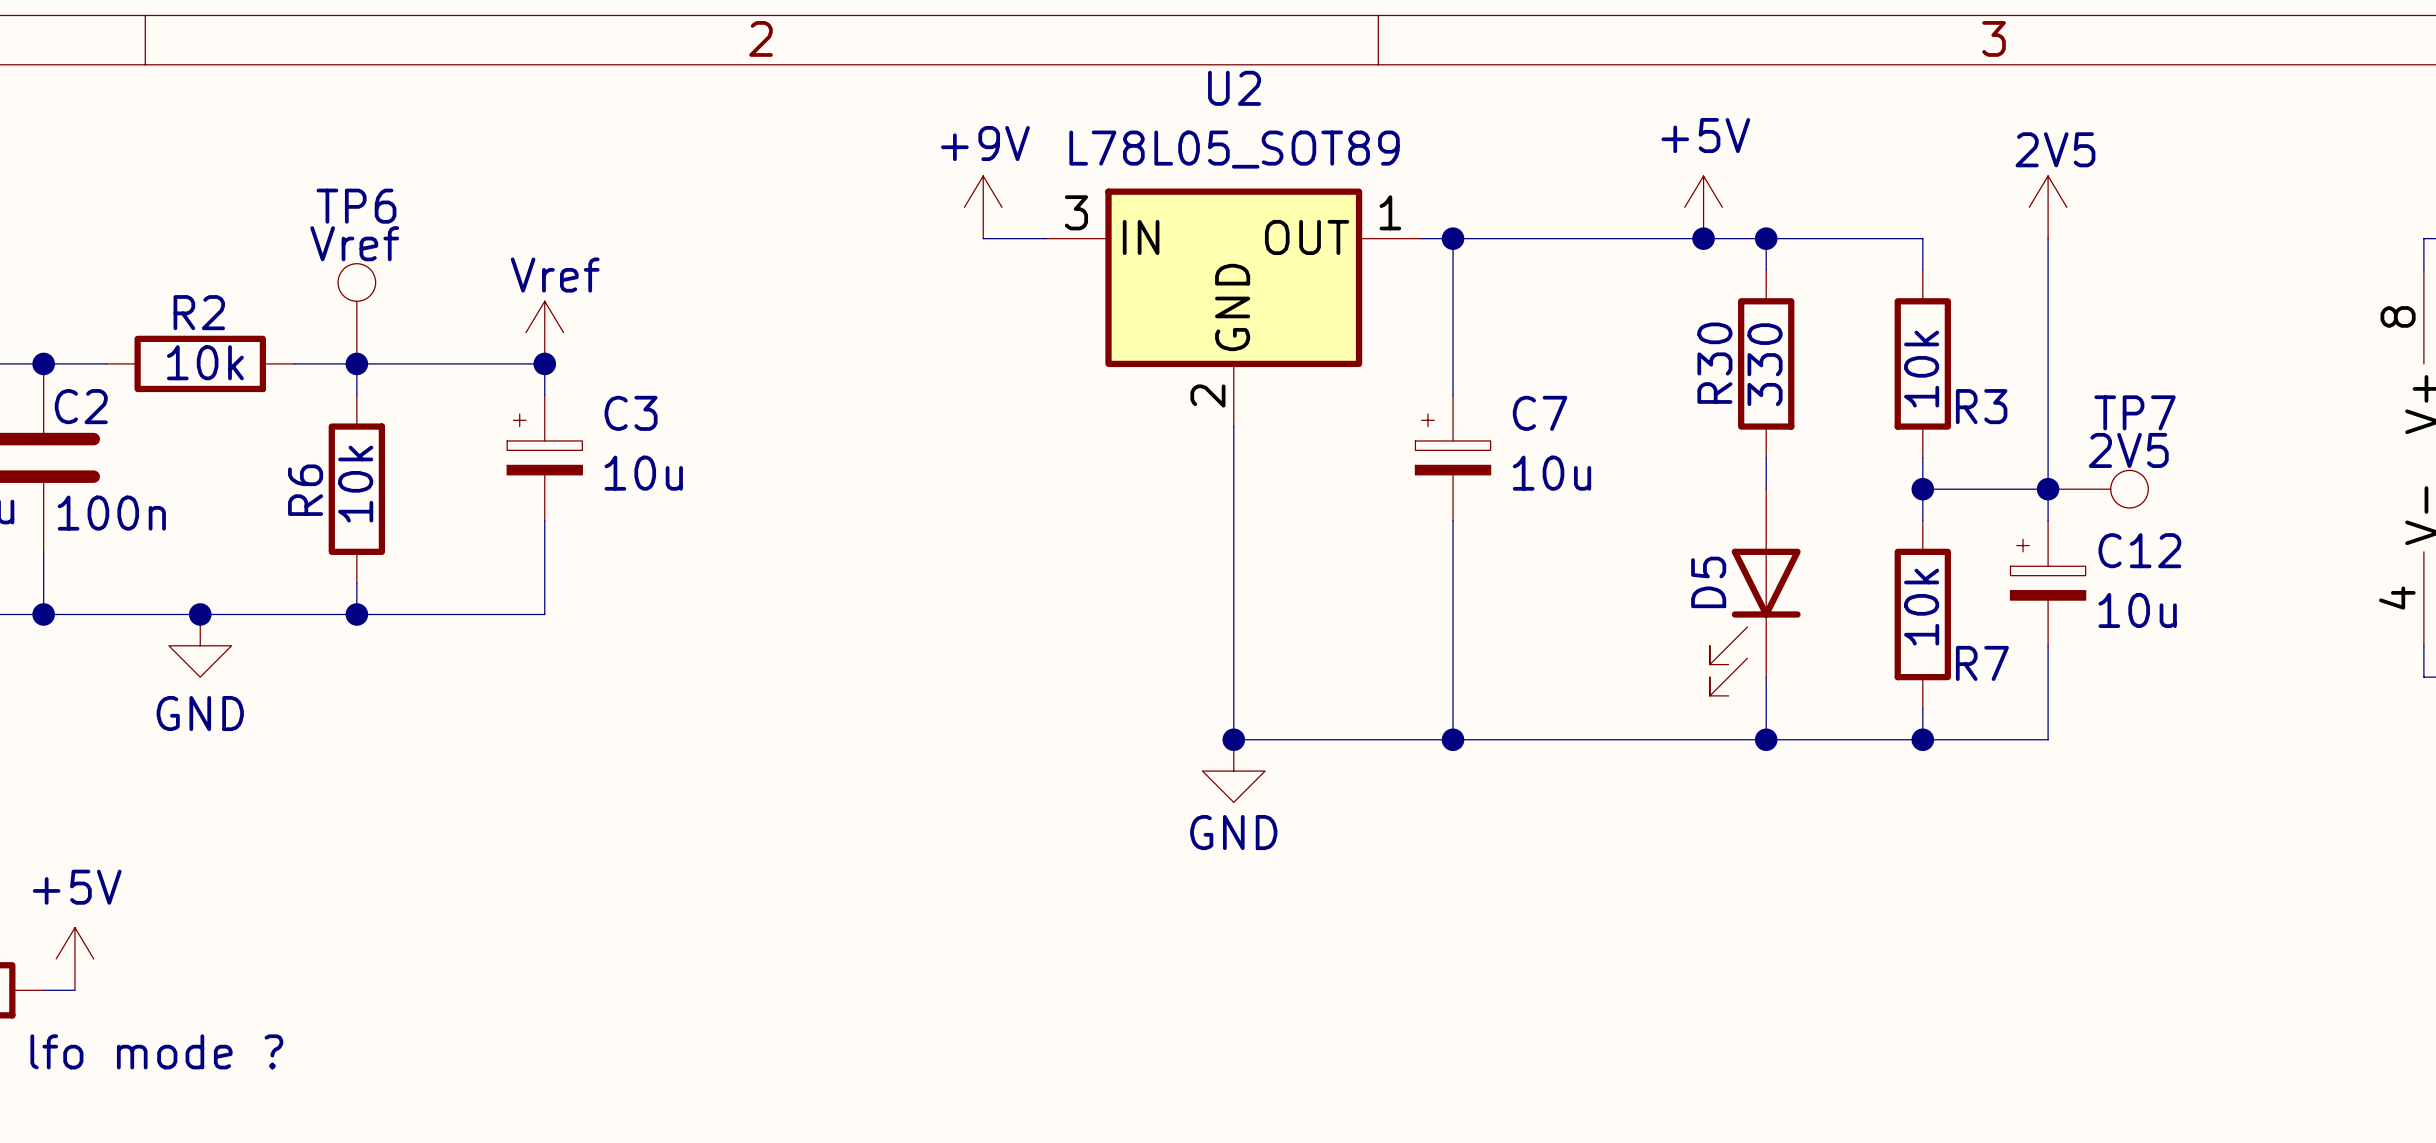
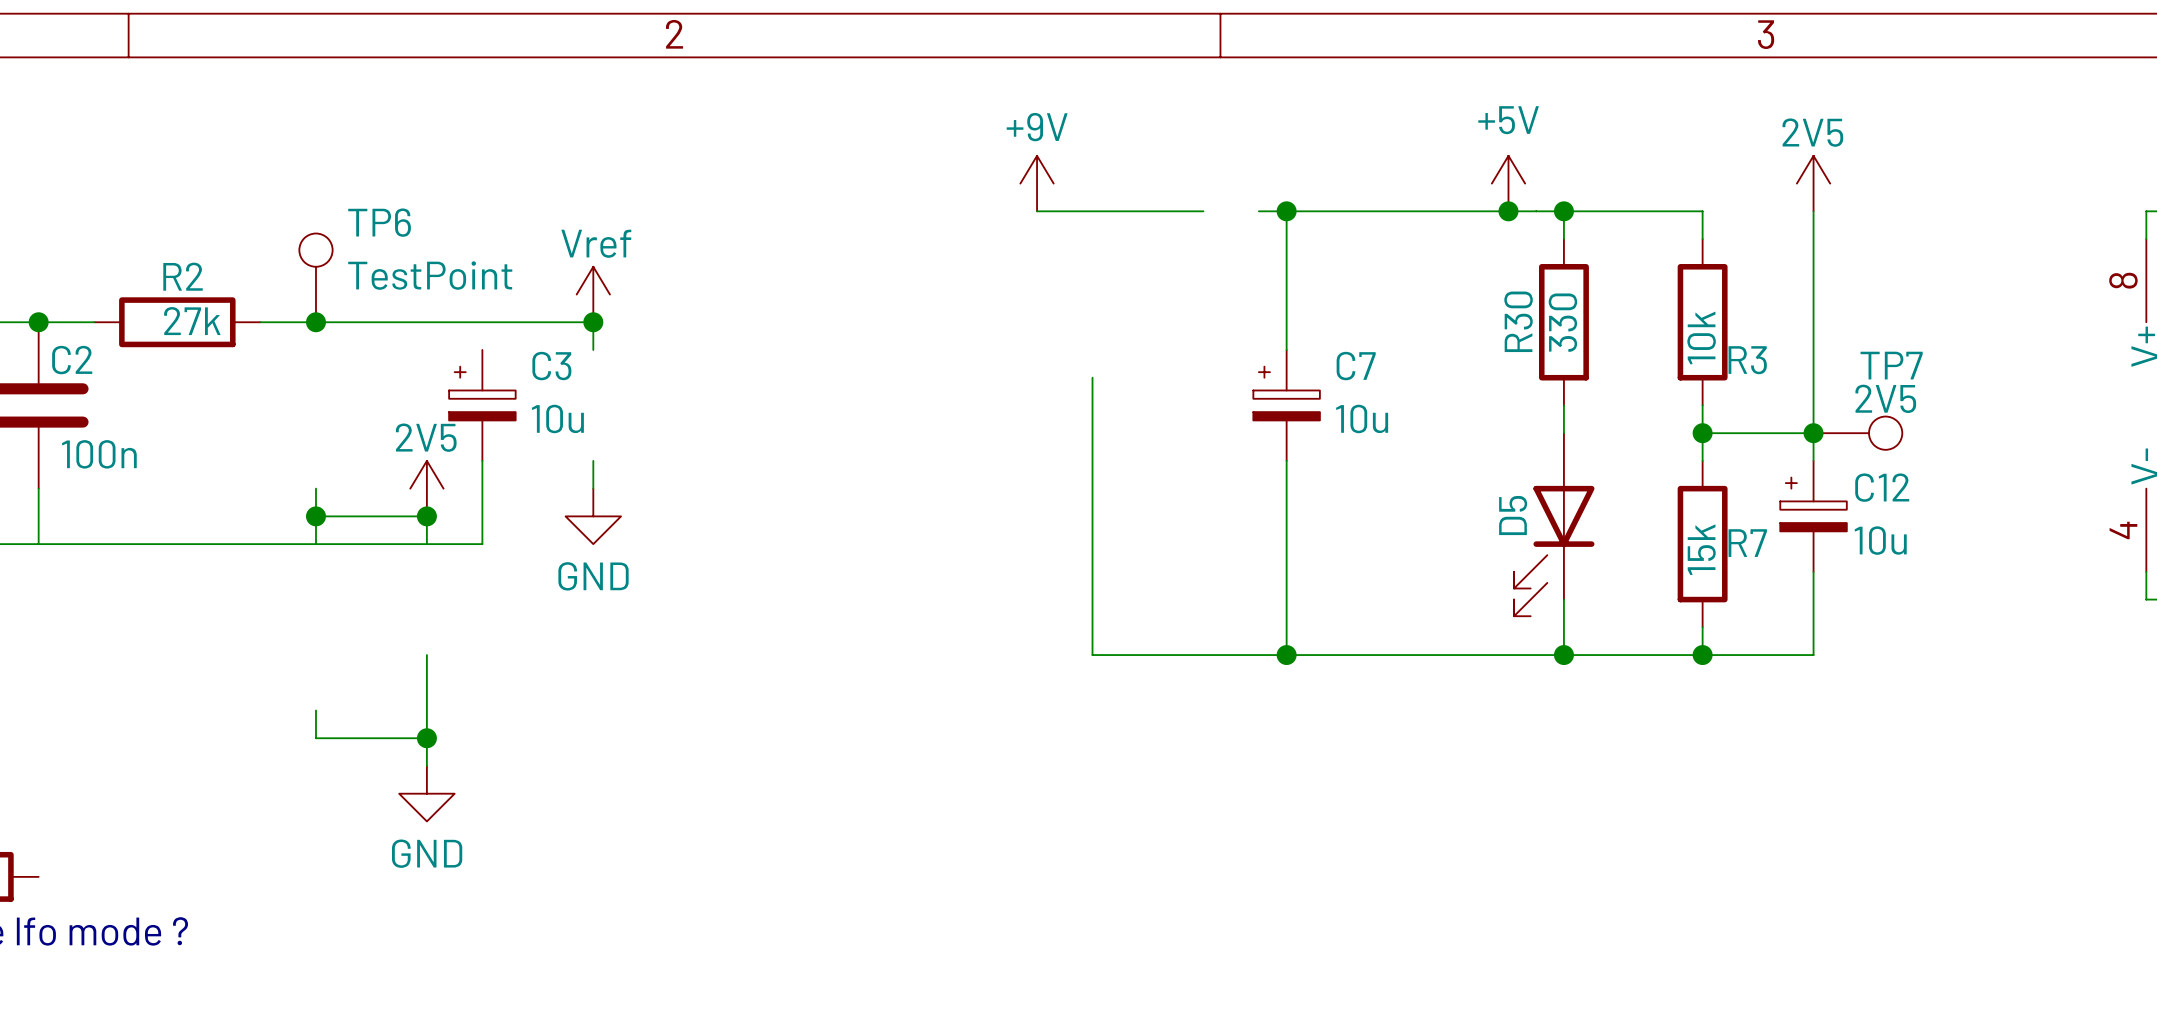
TP6 name position: TP6 (356, 206) -> TP6 (379, 222)
power symbol position: +9V (983, 207) -> +9V (1037, 183)
wire: (983, 238) (1045, 238) -> none
TP6 value: Vref (354, 243) -> TestPoint (430, 275)
U2: L78L05_SOT89 (1233, 307) -> none
power symbol position: Vref (544, 332) -> Vref (593, 294)
R2 value: 10k (205, 362) -> 27k (192, 321)
wire: (356, 363) (356, 395) -> (593, 460) (593, 488)
wire: (544, 363) (544, 395) -> (482, 322) (593, 322) (593, 349)
junction: (544, 363) -> none
junction: none -> (593, 322)
R6: 10k (356, 489) -> none
wire: none -> (315, 488) (315, 516) (426, 516) (426, 544)
power symbol: none -> 2V5 (426, 488)
junction: none -> (426, 516)
power symbol: none -> GND (593, 516)
R7 value: 10k (1921, 607) -> 15k (1701, 549)
junction: (43, 614) -> none
junction: (200, 614) -> none
junction position: (356, 614) -> (315, 516)
power symbol: GND (200, 645) -> none
R7 name position: R7 (1982, 663) -> R7 (1747, 543)
wire: none -> (426, 655) (426, 765)
junction: (1233, 739) -> none
power symbol: GND (1233, 771) -> none
wire: none -> (315, 710) (315, 738) (426, 738)
junction: none -> (426, 738)
power symbol: none -> GND (426, 793)
power symbol: +5V (74, 958) -> none
wire: (43, 990) (74, 990) -> none

